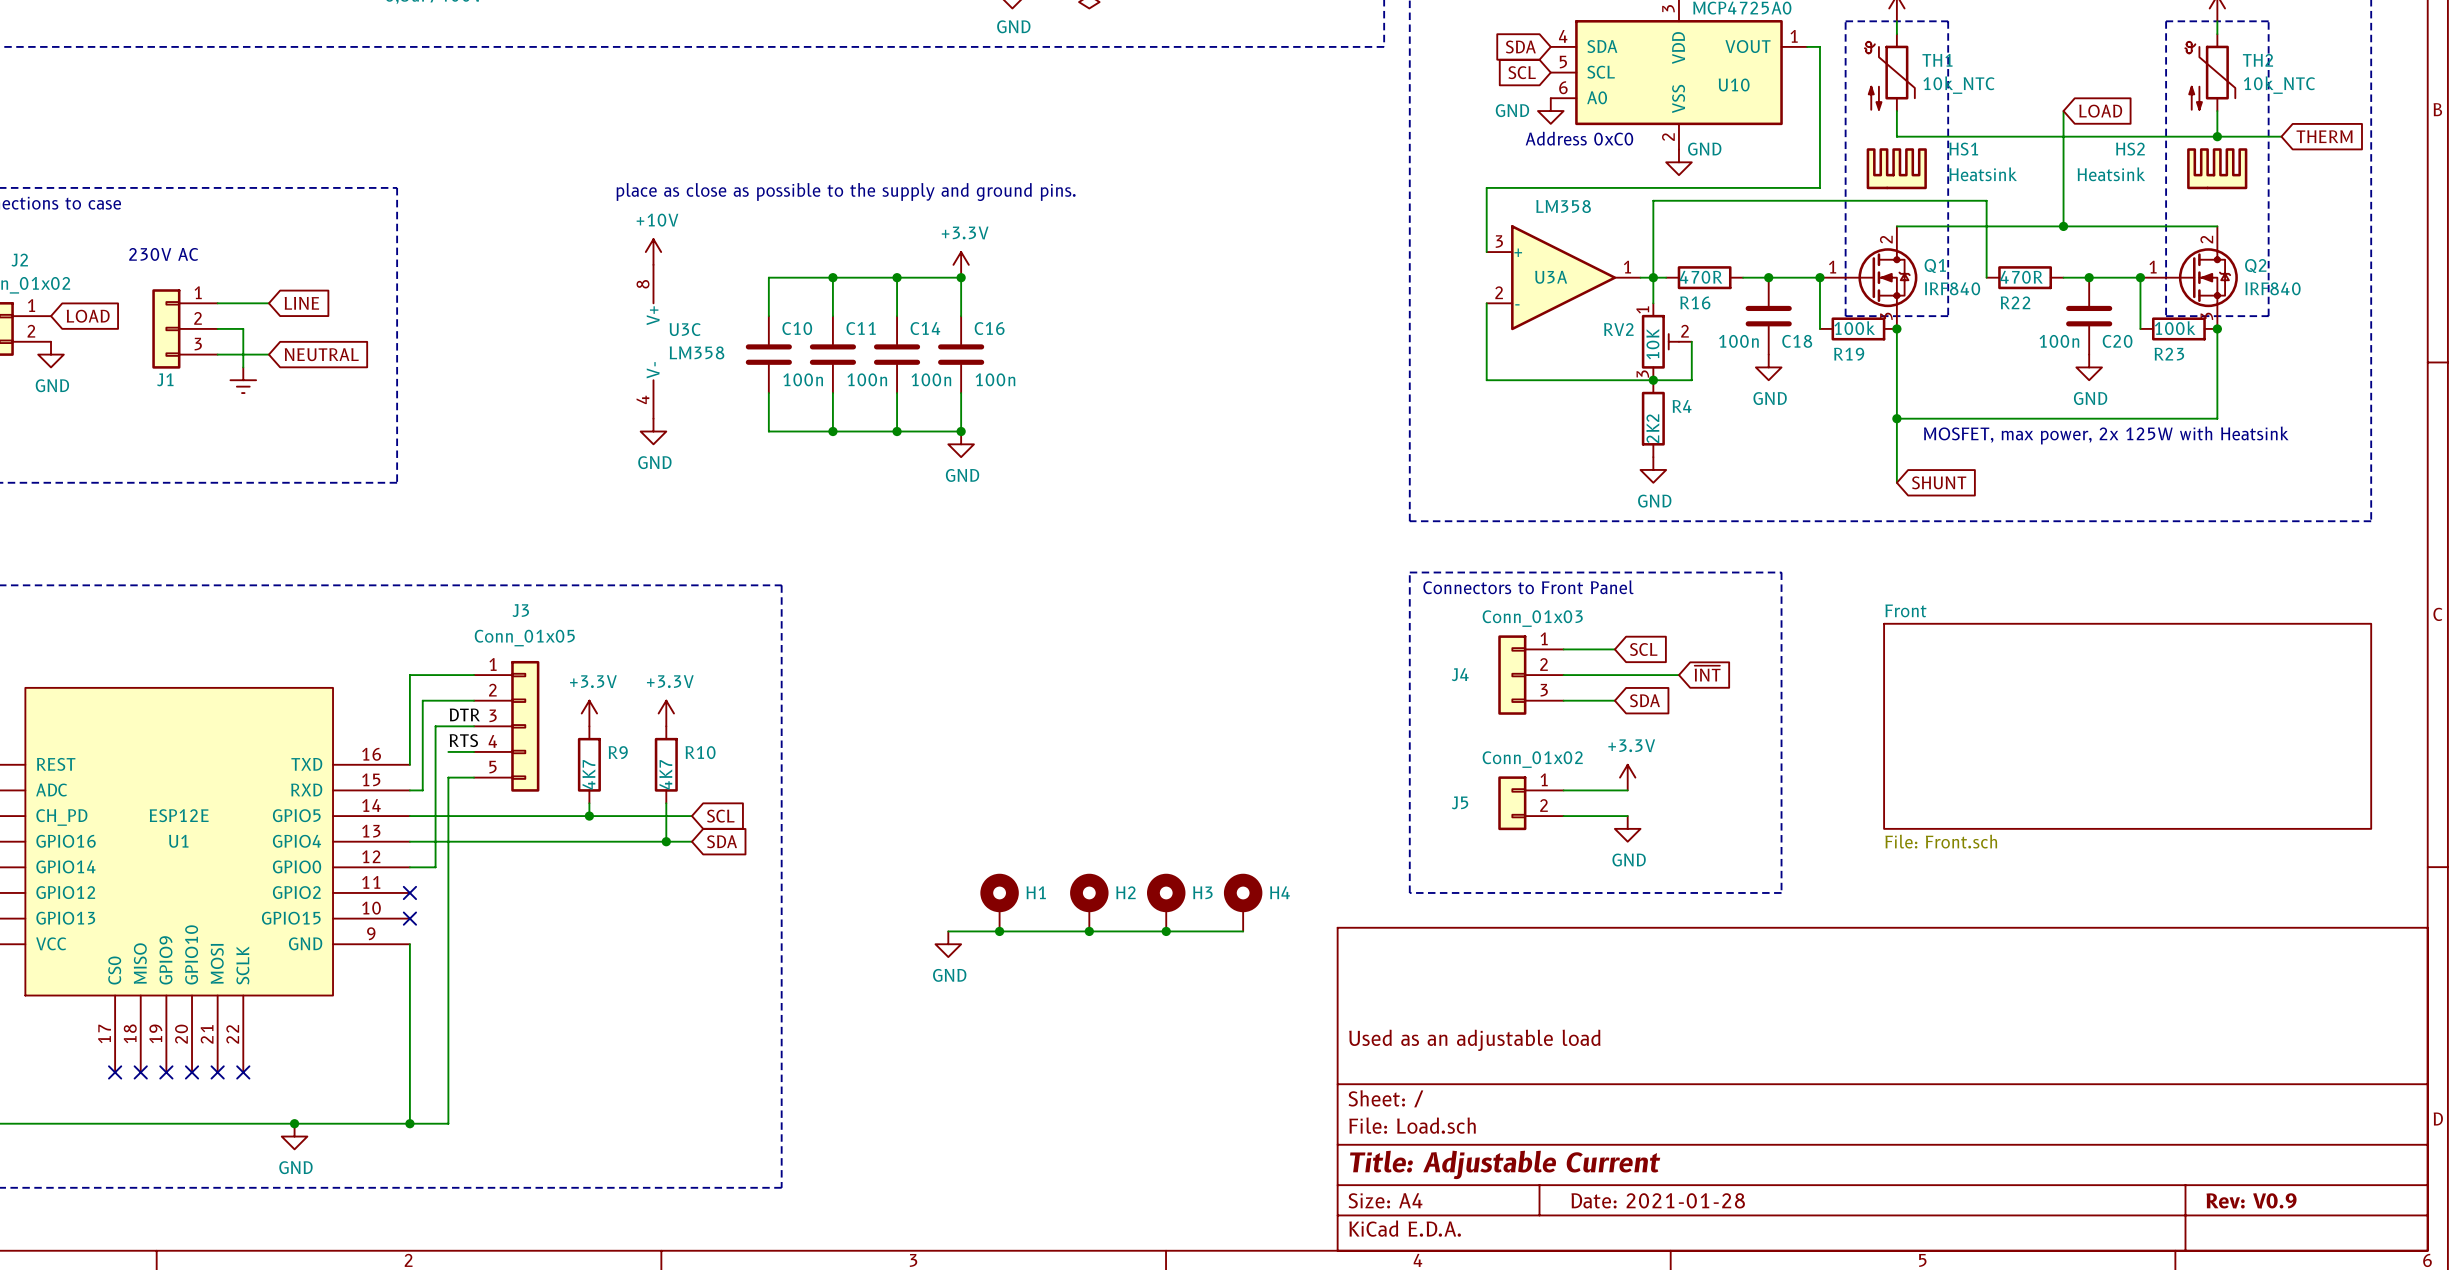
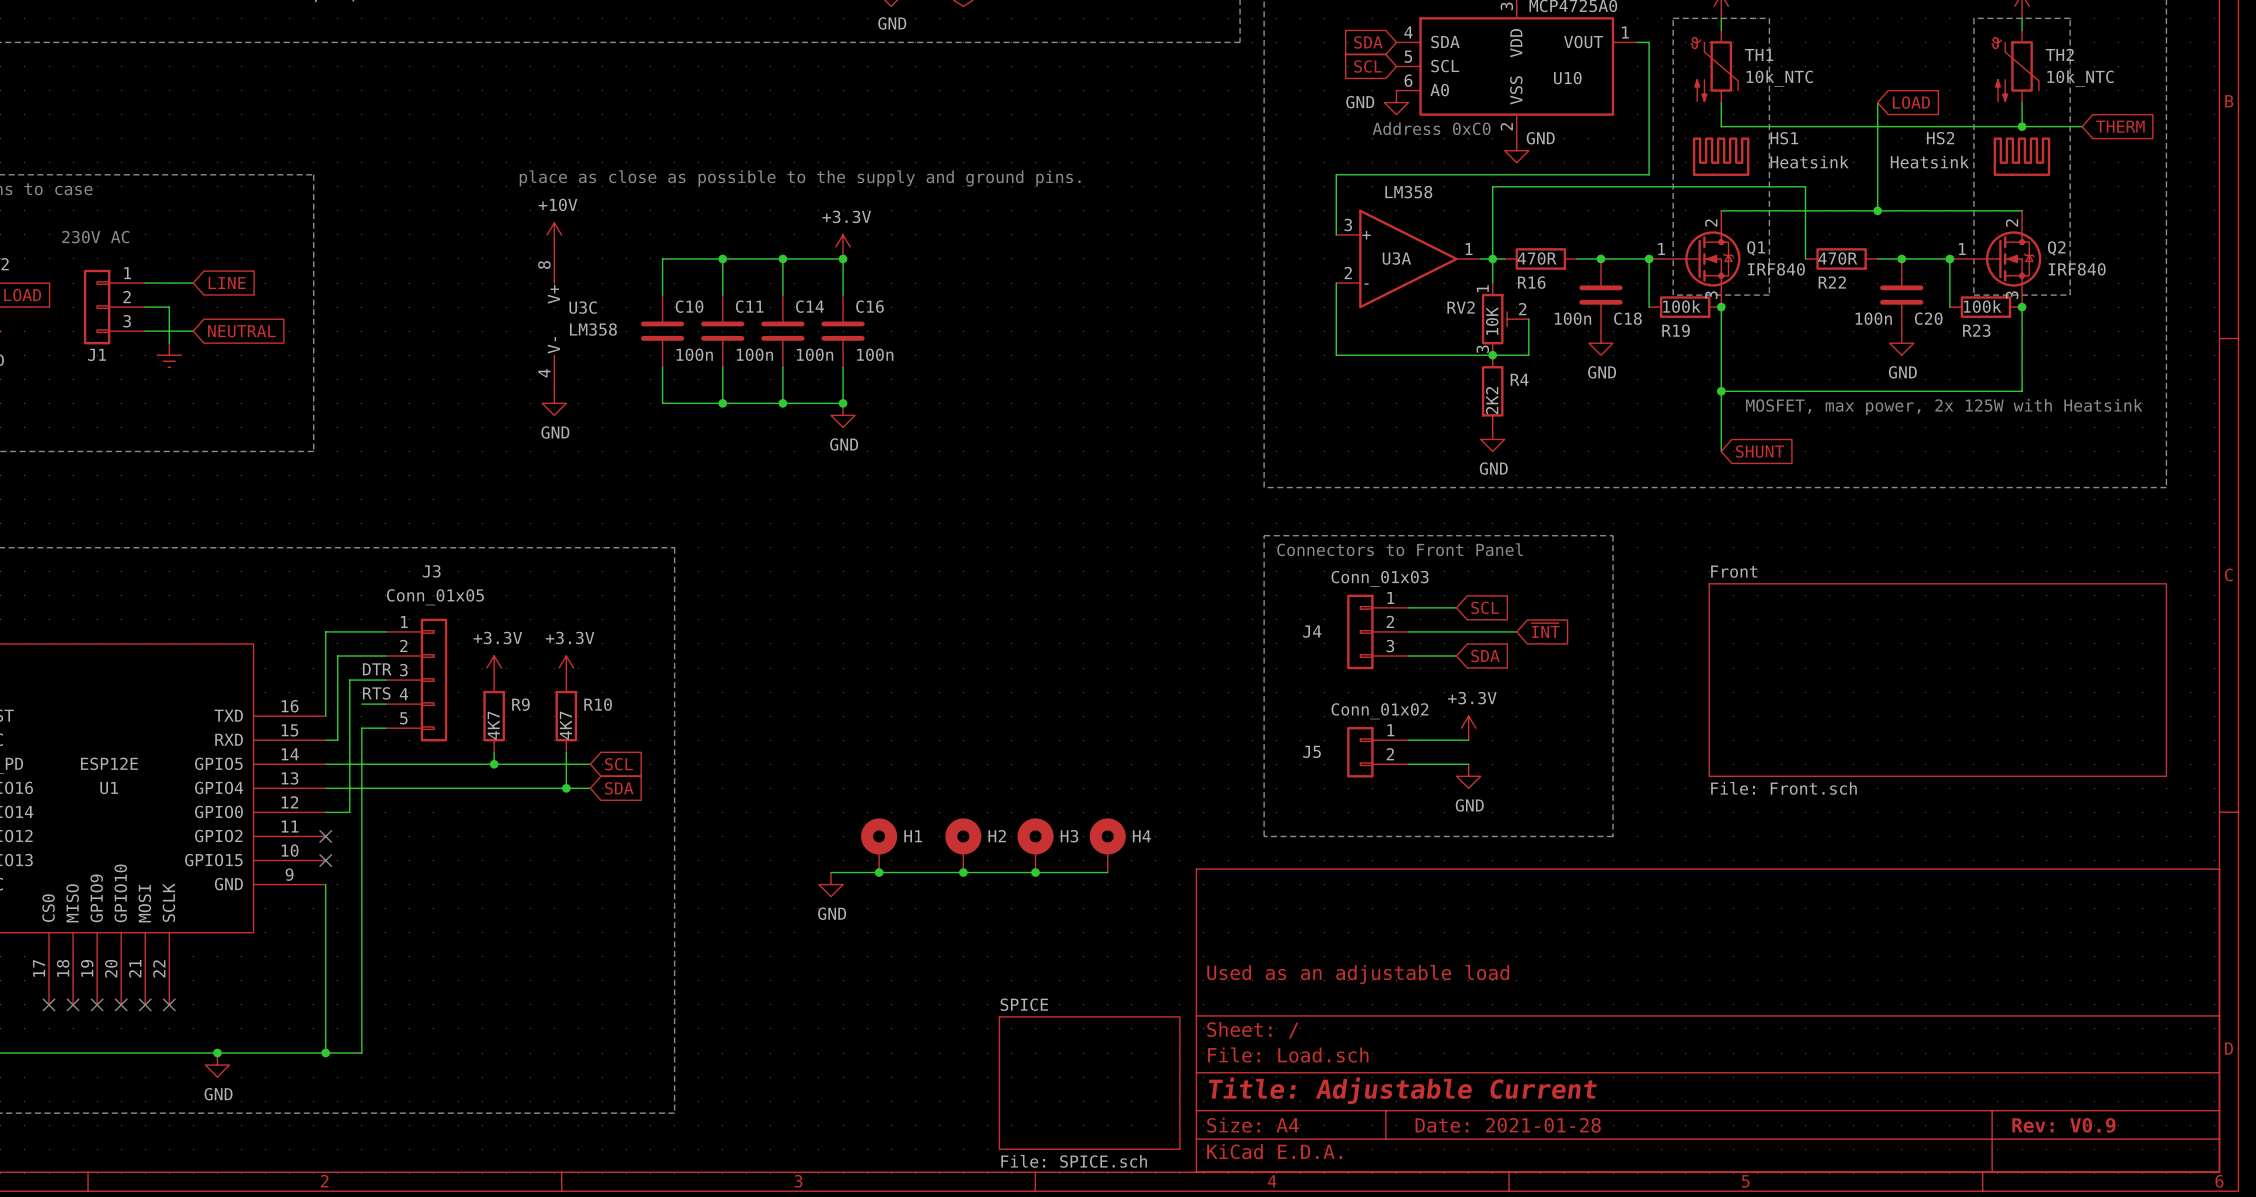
sheet SPICE: none -> File: SPICE.sch (1089, 1083)

